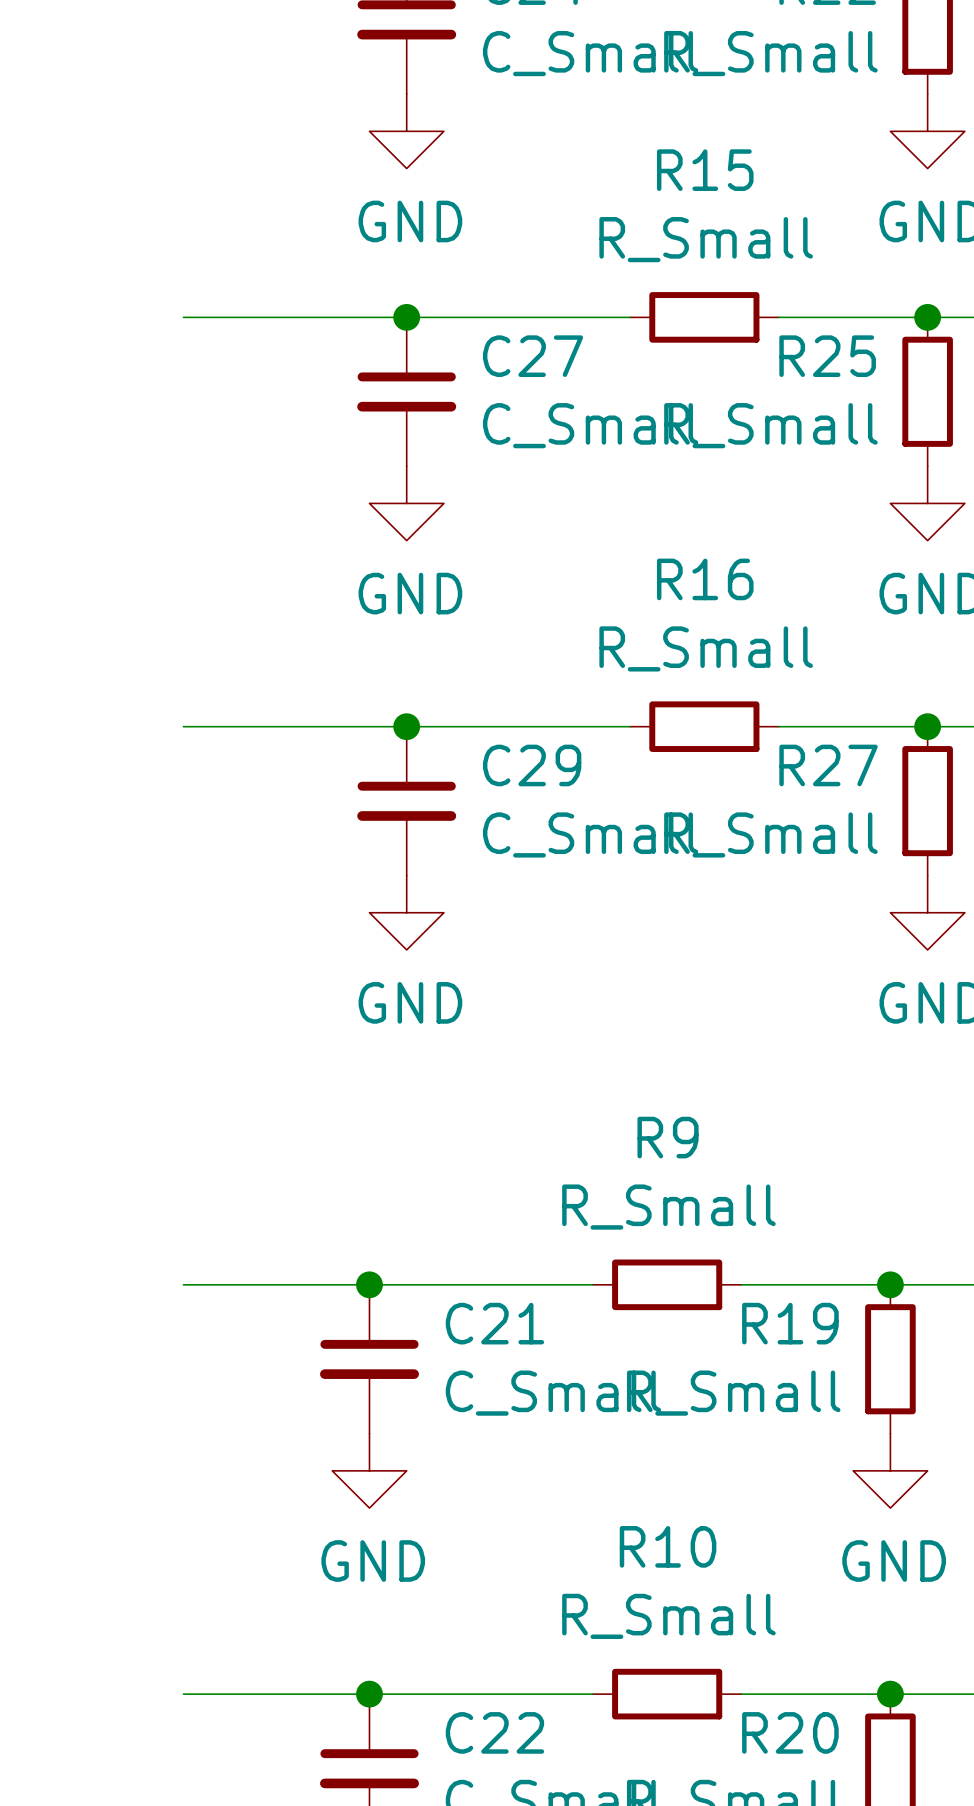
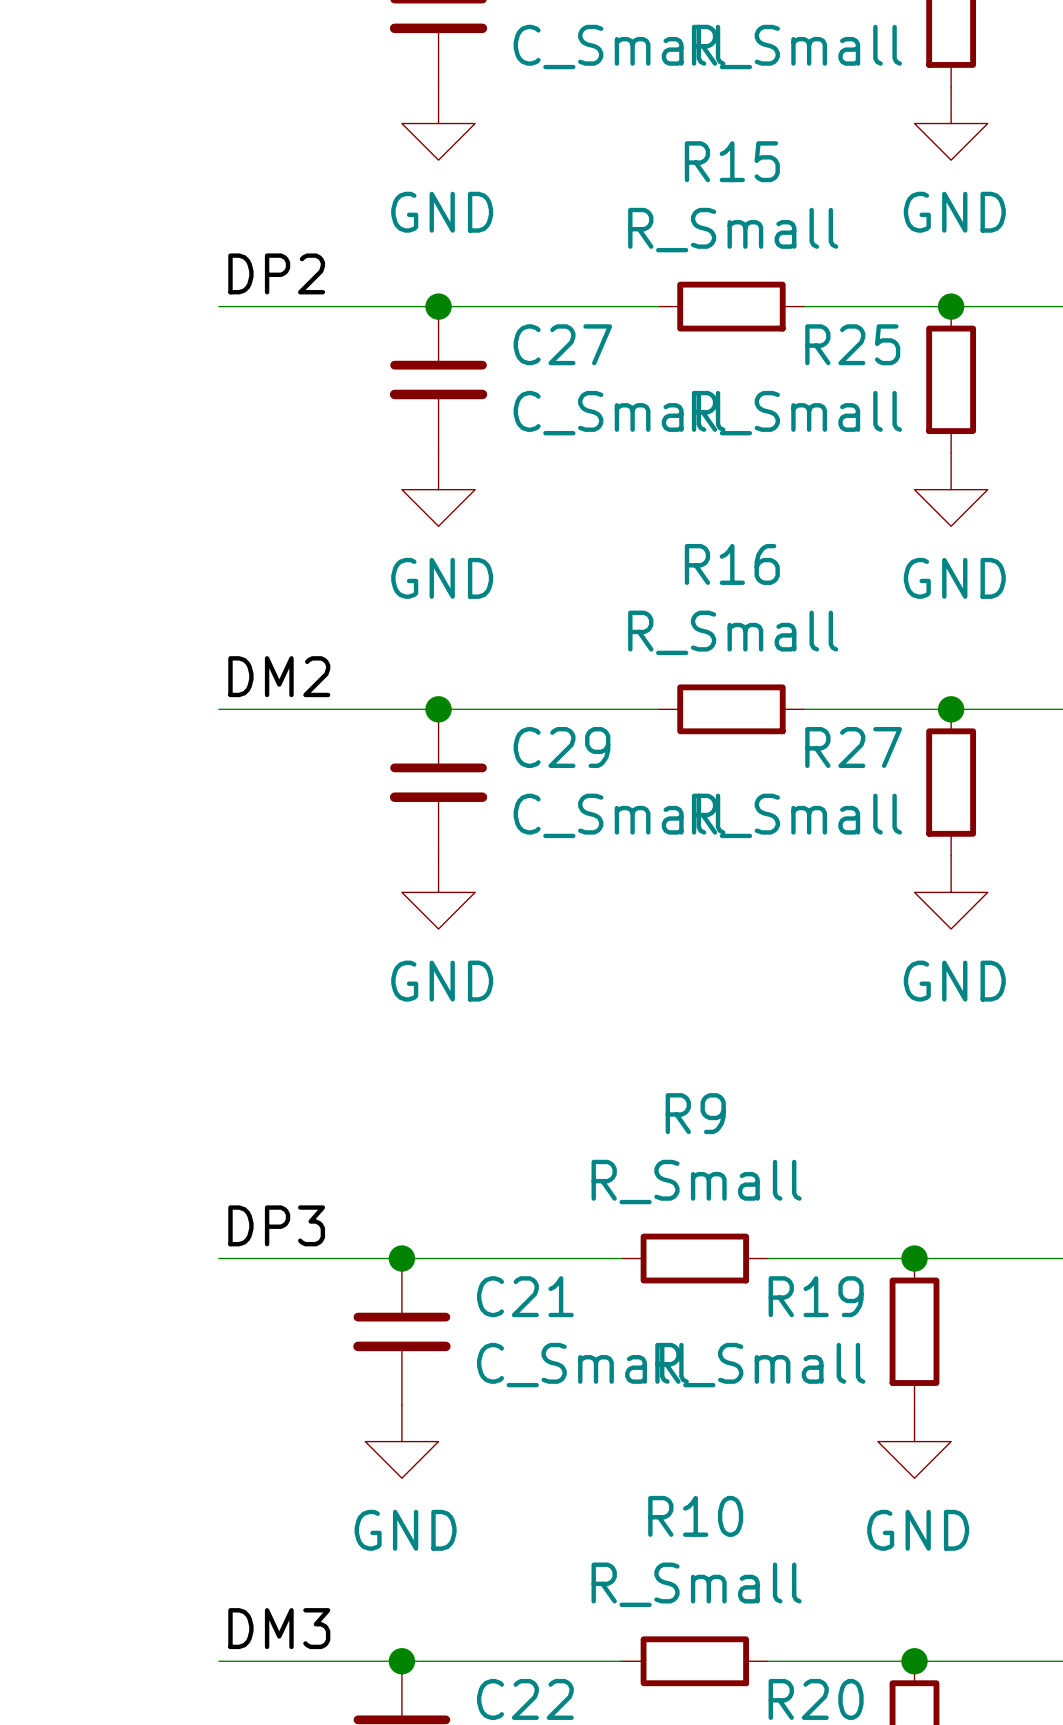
label: none -> DP2 (276, 273)
label: none -> DM2 (279, 676)
label: none -> DP3 (276, 1225)
label: none -> DM3 (279, 1628)

